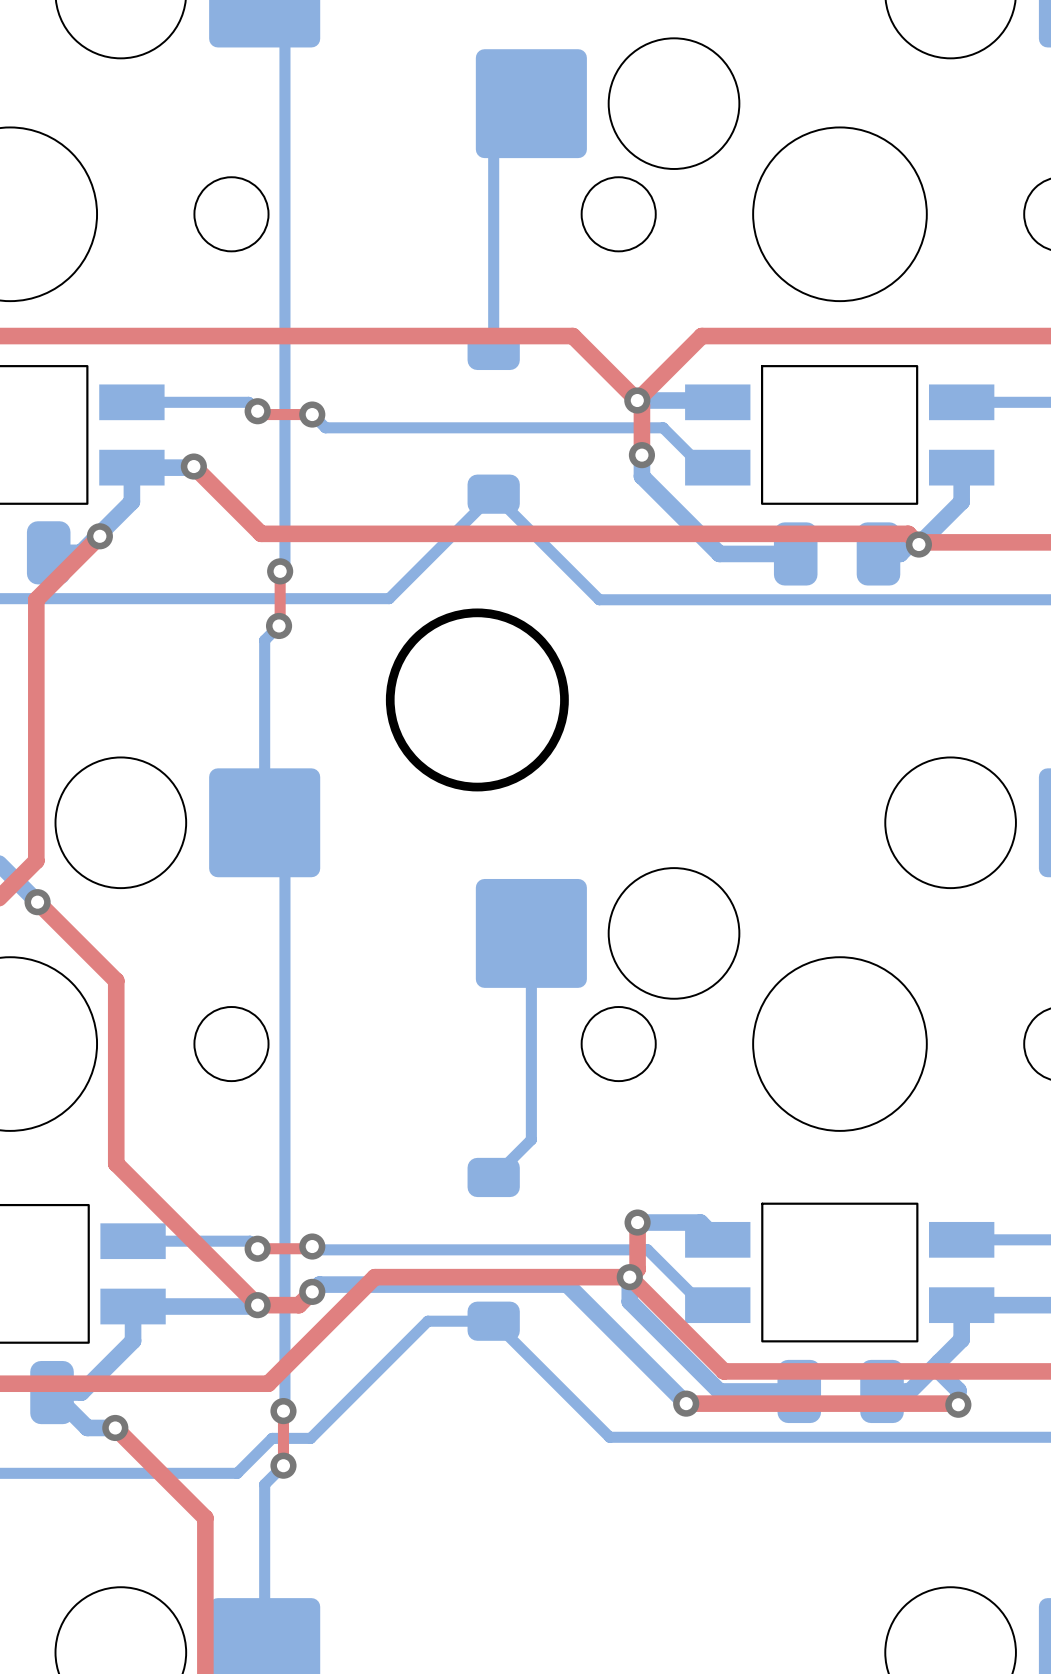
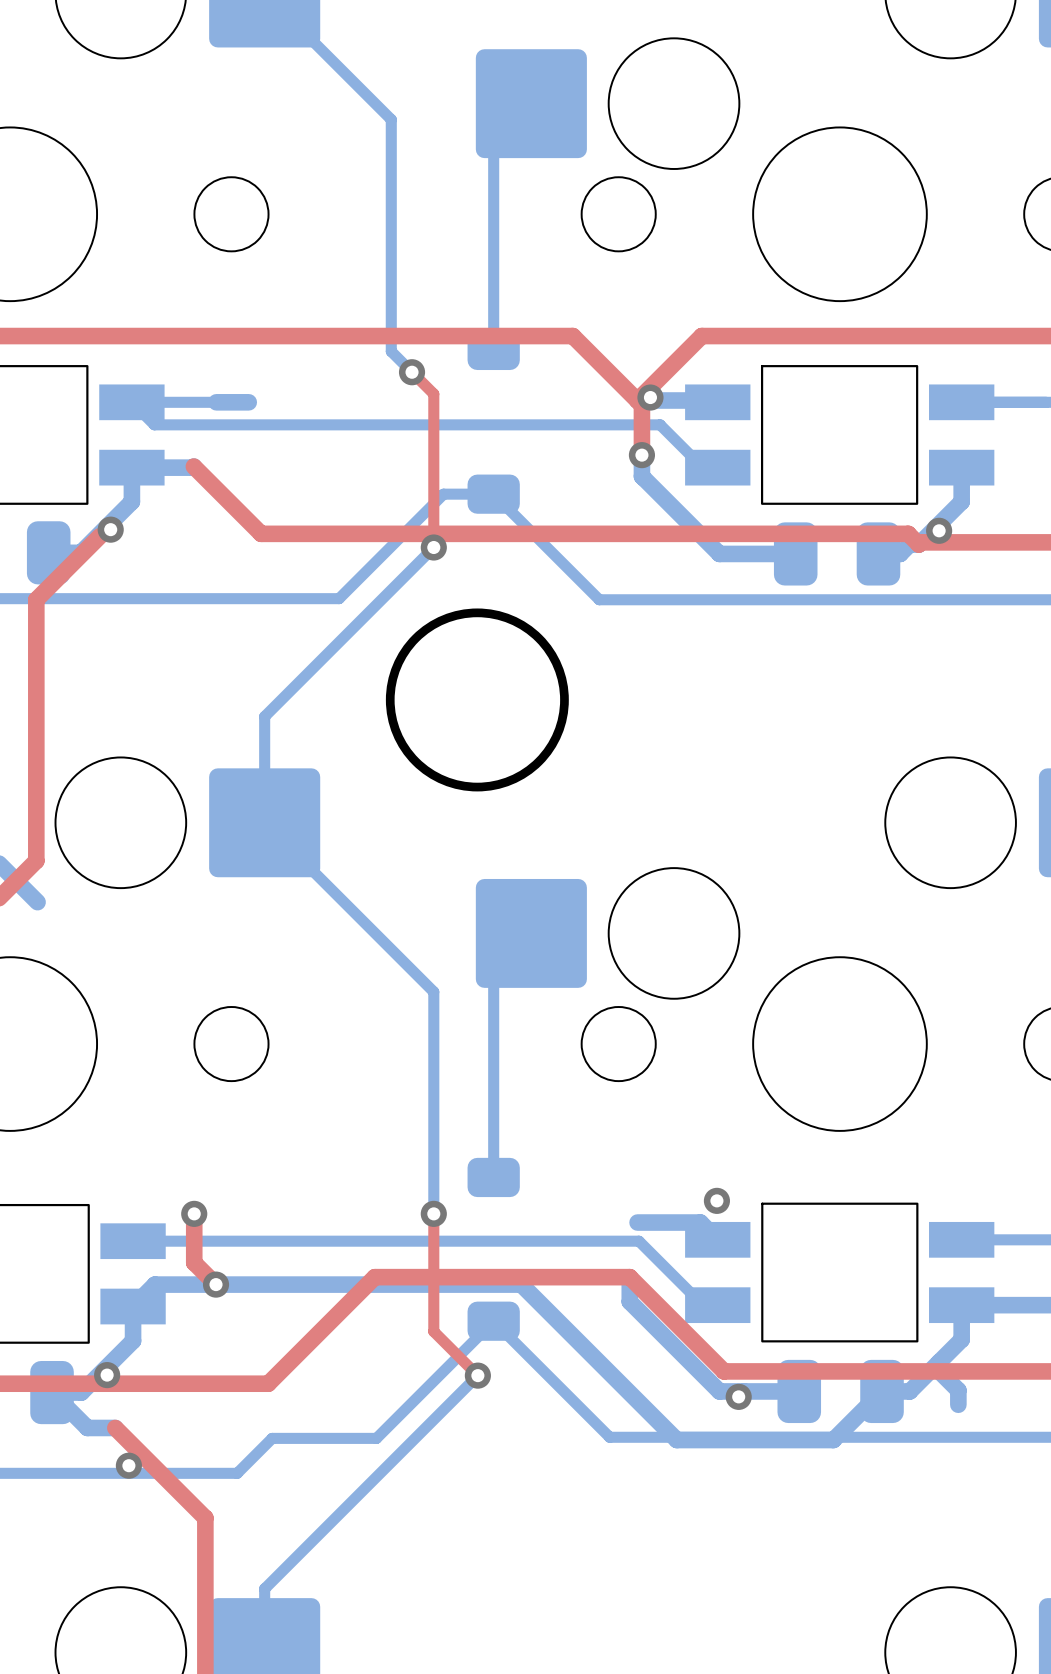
bottom track: (284, 13) (284, 566) (280, 571) -> (284, 13) (391, 119) (391, 351) (412, 372)
top track: none -> (412, 372) (433, 394) (433, 547)
via: none -> (412, 372)
via position: (637, 400) -> (650, 397)
bottom track width: thin (216, 402) (248, 402) -> thick (216, 402) (248, 402)
top track: (257, 411) (260, 414) (312, 414) -> none
via: (257, 411) -> none
bottom track: (312, 414) (325, 427) (663, 427) -> (131, 402) (154, 424) (660, 424) (663, 427)
via: (312, 414) -> none
via: (193, 466) -> none
bottom track: (493, 494) (389, 598) (339, 598) -> (493, 494) (443, 494) (339, 598)
via position: (99, 536) -> (110, 529)
via position: (918, 544) -> (939, 530)
via: none -> (433, 547)
top track: (280, 571) (279, 625) -> none
via: (280, 571) -> none
bottom track: (279, 625) (264, 640) (264, 716) -> (433, 547) (264, 716)
via: (279, 625) -> none
bottom track: (284, 843) (283, 1411) -> (284, 843) (433, 991) (433, 1213)
top track: (37, 902) (116, 980) (116, 1163) (257, 1305) (298, 1305) (312, 1291) -> none
via: (37, 902) -> none
bottom track: (531, 933) (531, 1139) (493, 1177) -> (531, 933) (493, 971) (493, 1177)
via: none -> (716, 1200)
top track: none -> (194, 1213) (194, 1262) (216, 1284)
via: none -> (194, 1213)
top track: none -> (433, 1213) (433, 1331) (477, 1375)
via: none -> (433, 1213)
top track: (637, 1222) (637, 1269) (629, 1277) -> none
via: (637, 1222) -> none
top track: (312, 1246) (310, 1248) (257, 1248) -> none
bottom track: (312, 1246) (315, 1249) (647, 1249) -> (250, 1241) (638, 1241) (647, 1249)
via: (312, 1246) -> none
via: (257, 1248) -> none
via: (629, 1277) -> none
via: none -> (216, 1284)
bottom track: (521, 1284) (567, 1284) (686, 1403) -> (521, 1284) (676, 1440) (833, 1440) (882, 1391)
via: (312, 1291) -> none
bottom track: (257, 1305) (133, 1306) -> (319, 1284) (154, 1284) (133, 1306)
via: (257, 1305) -> none
bottom track: (493, 1321) (427, 1321) (310, 1438) -> (493, 1321) (376, 1438) (310, 1438)
via: none -> (107, 1375)
via: none -> (477, 1375)
top track: (686, 1403) (958, 1404) -> none
via position: (686, 1403) -> (738, 1396)
via: (958, 1404) -> none
top track: (283, 1411) (283, 1465) -> none
via: (283, 1411) -> none
via: (115, 1427) -> none
via: none -> (128, 1465)
bottom track: (283, 1465) (264, 1484) (264, 1588) -> (477, 1375) (264, 1588)
via: (283, 1465) -> none

